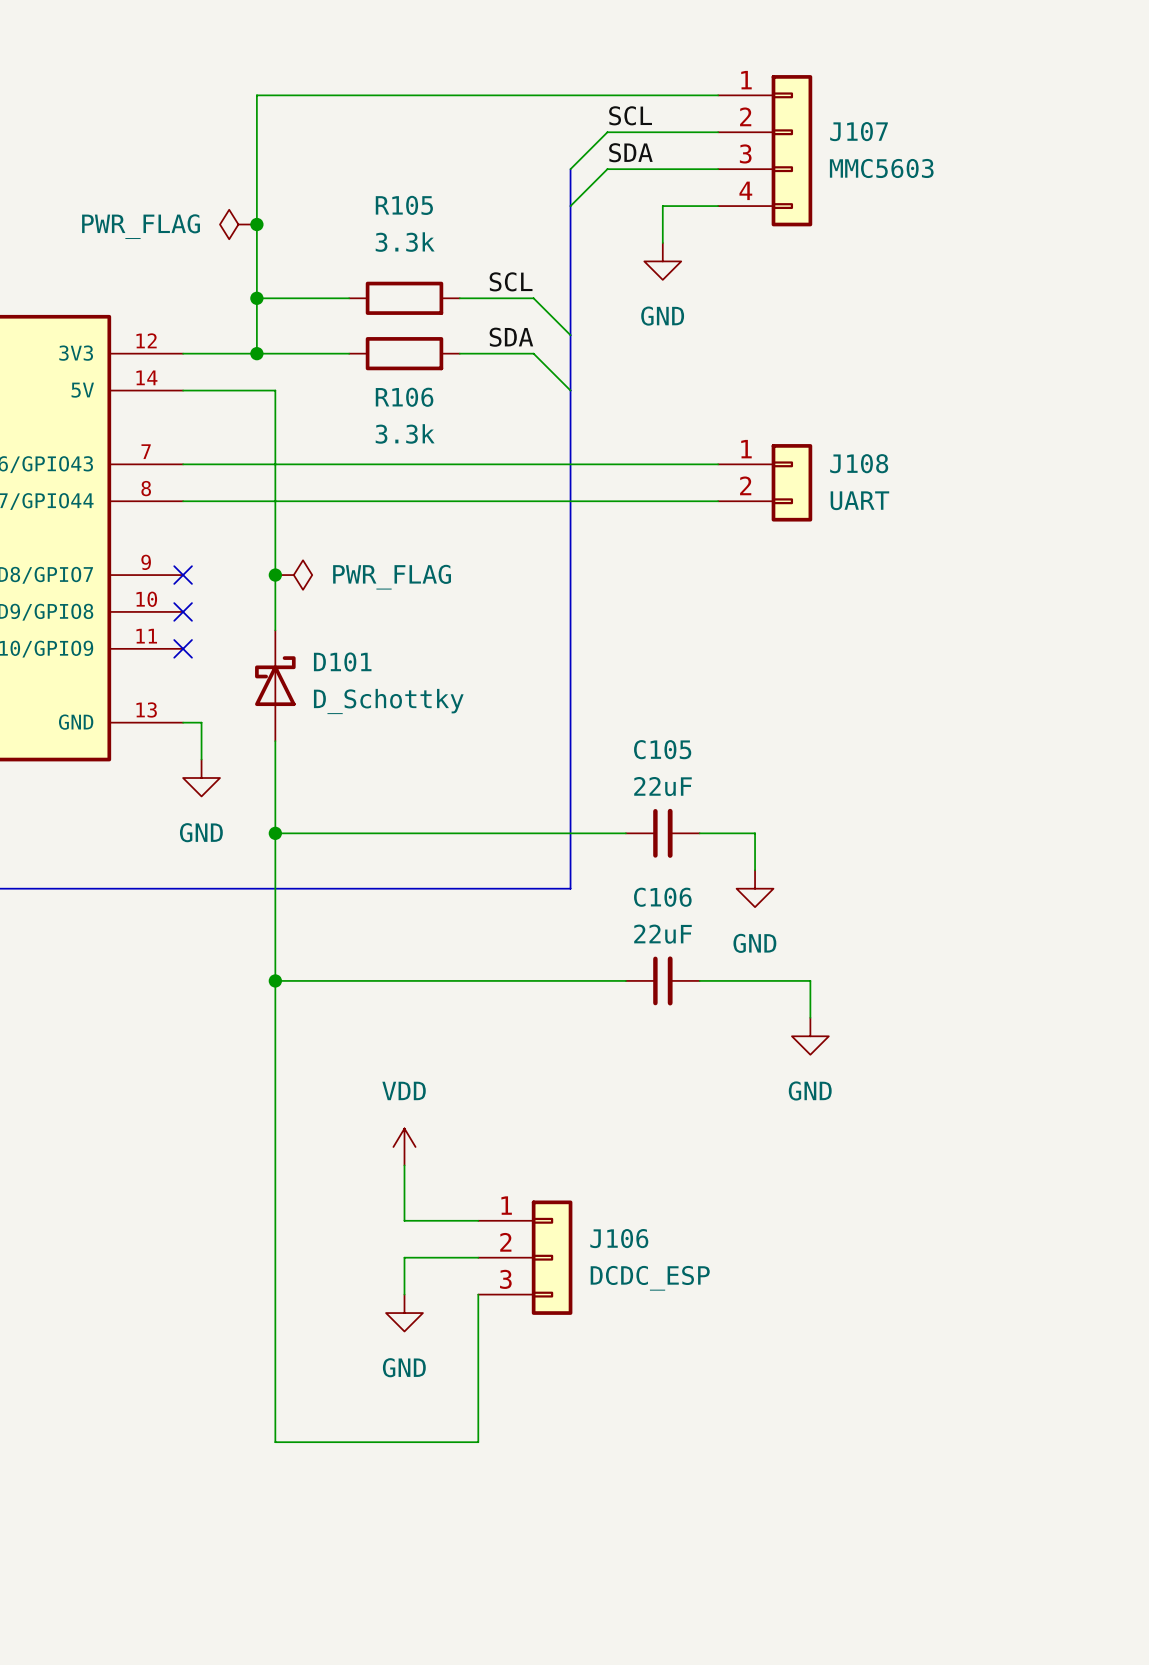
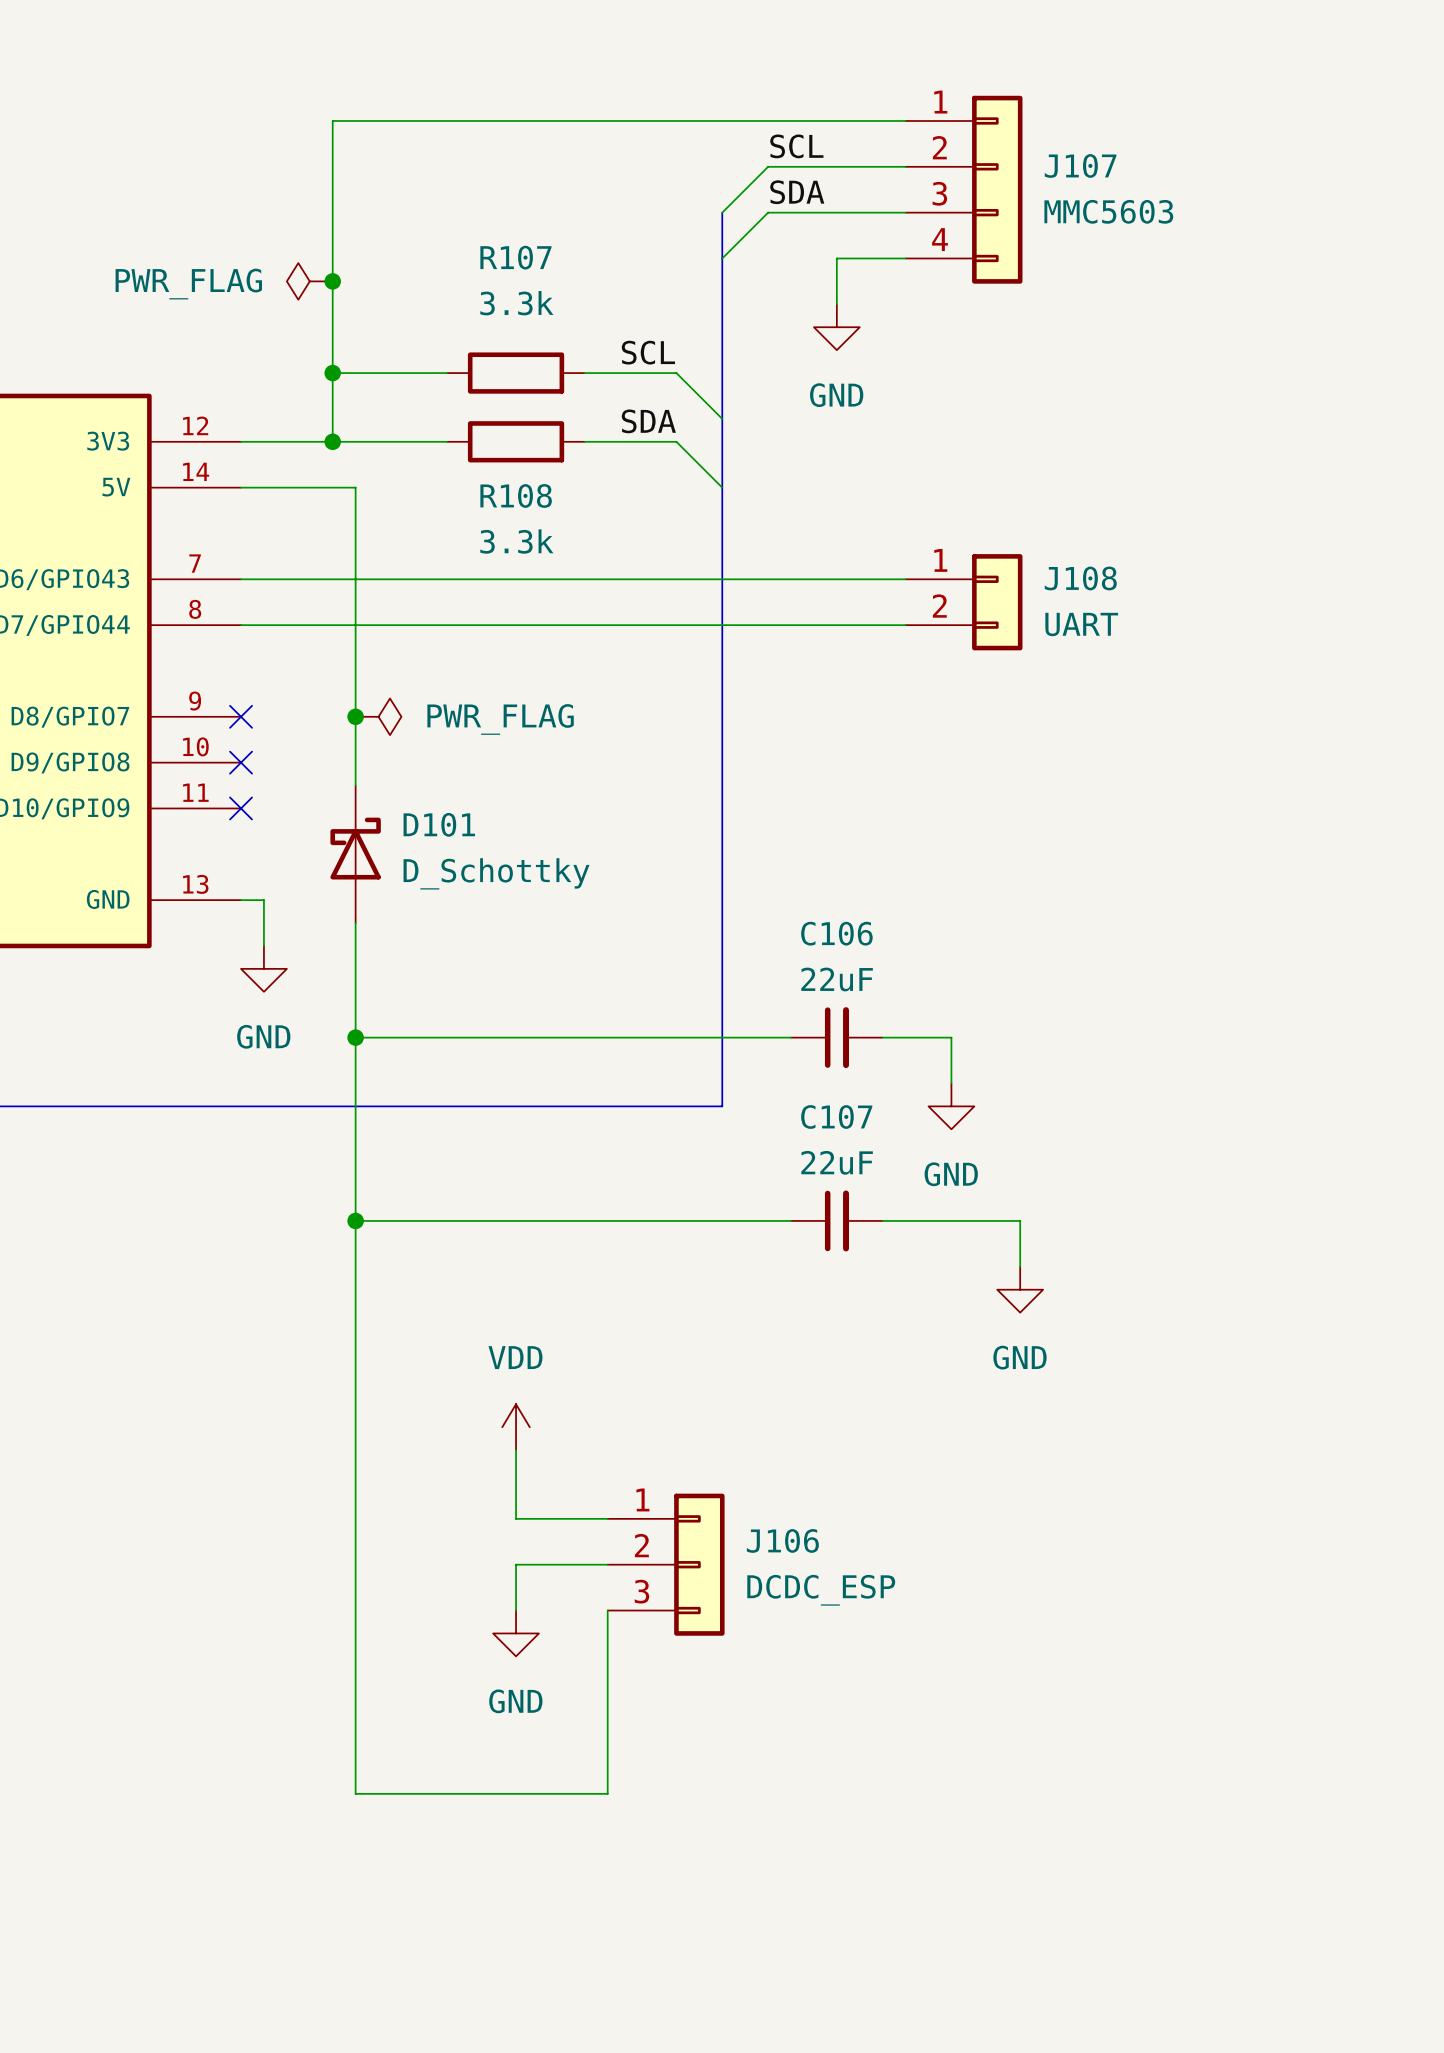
R105 name: R105 (404, 205) -> R107 (515, 257)
R106 name: R106 (404, 397) -> R108 (516, 495)
C105 name: C105 (662, 749) -> C106 (836, 933)
C106 name: C106 (662, 897) -> C107 (836, 1117)

